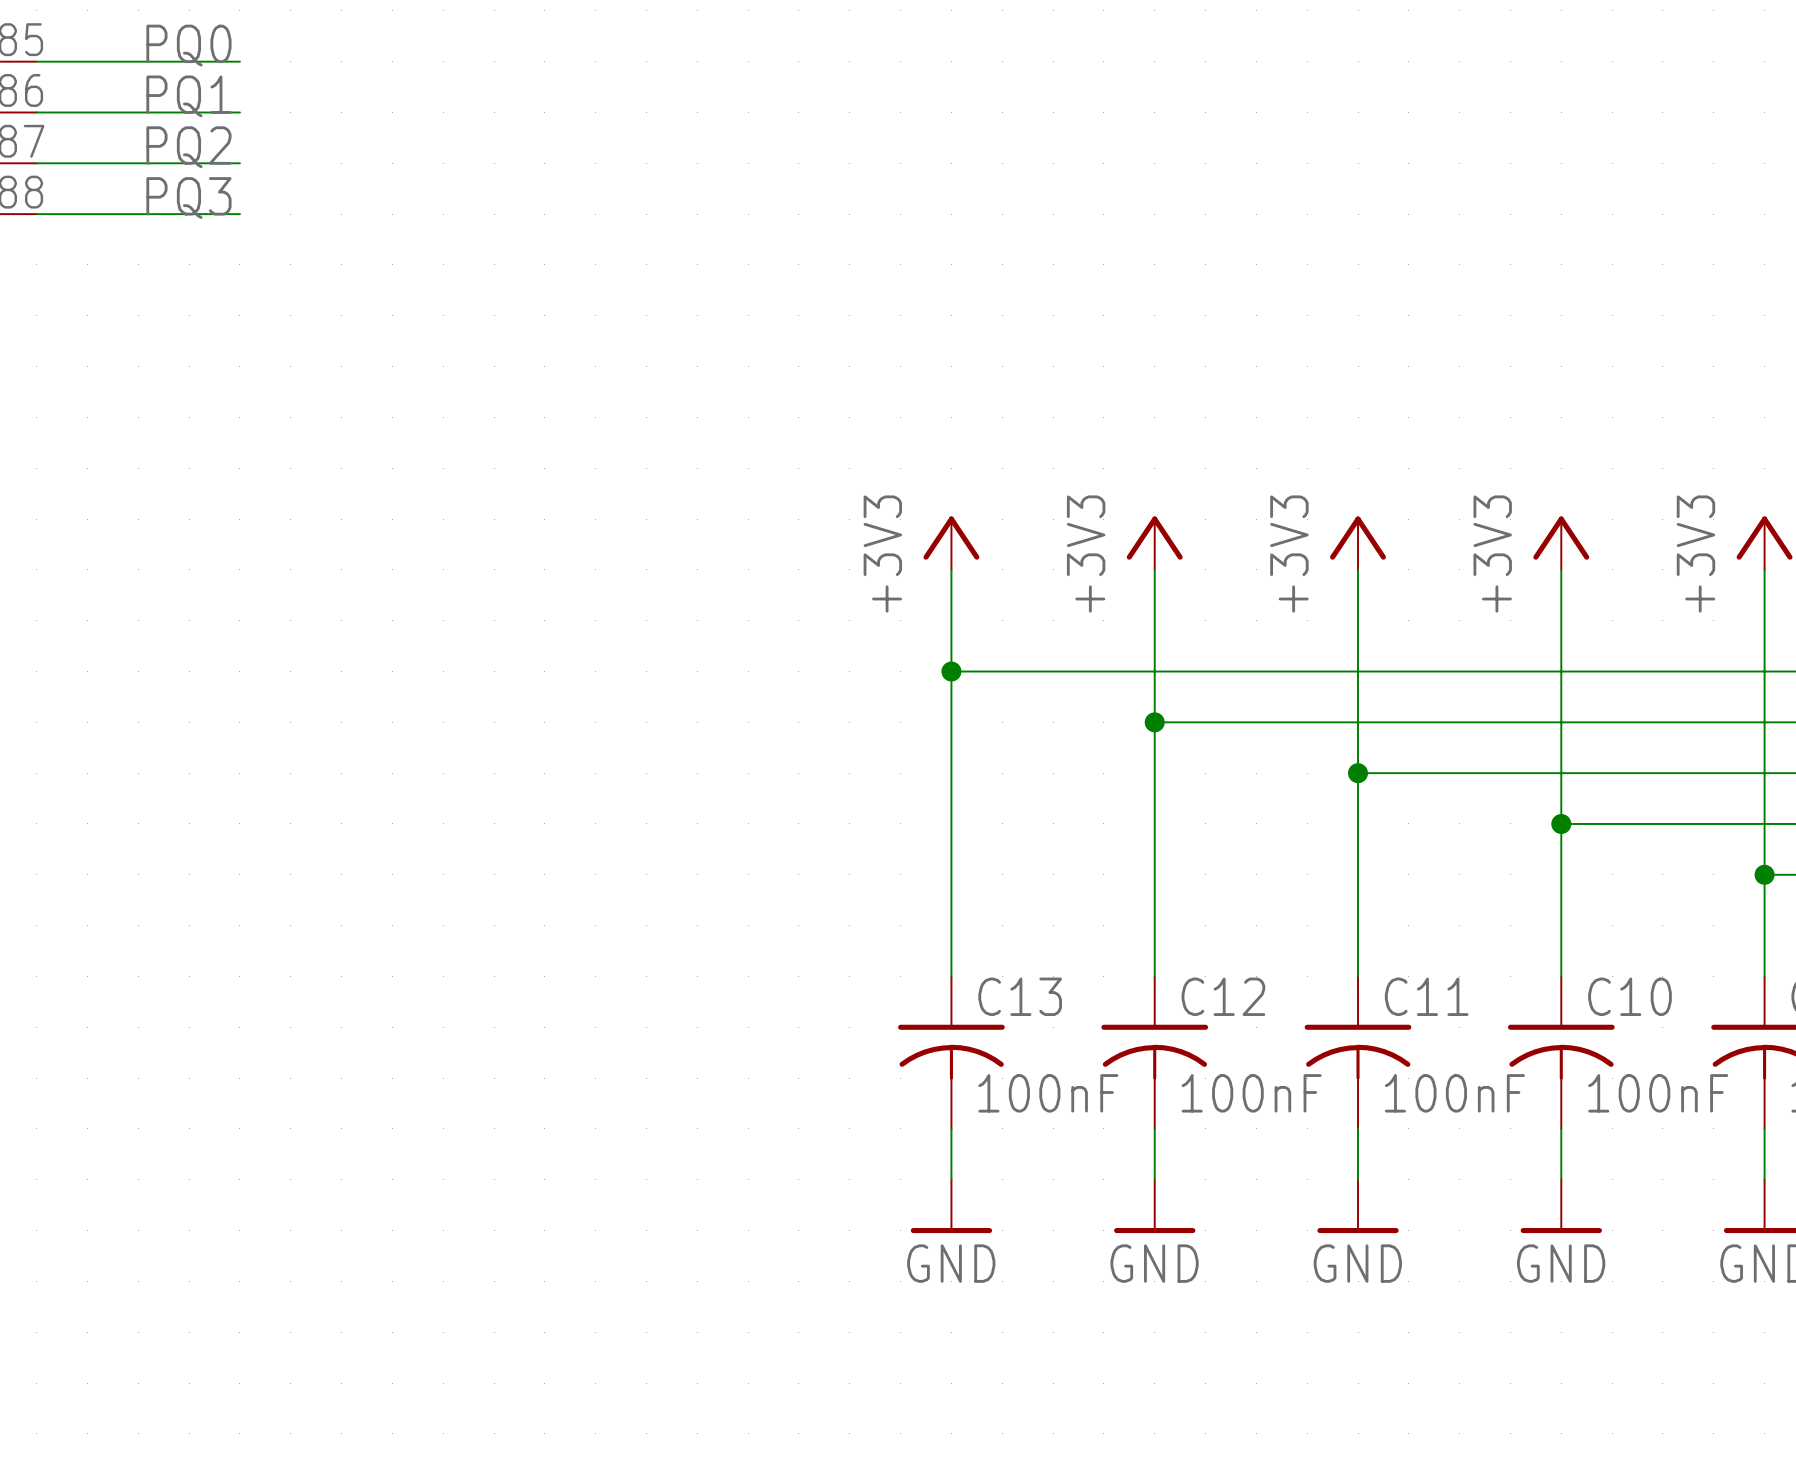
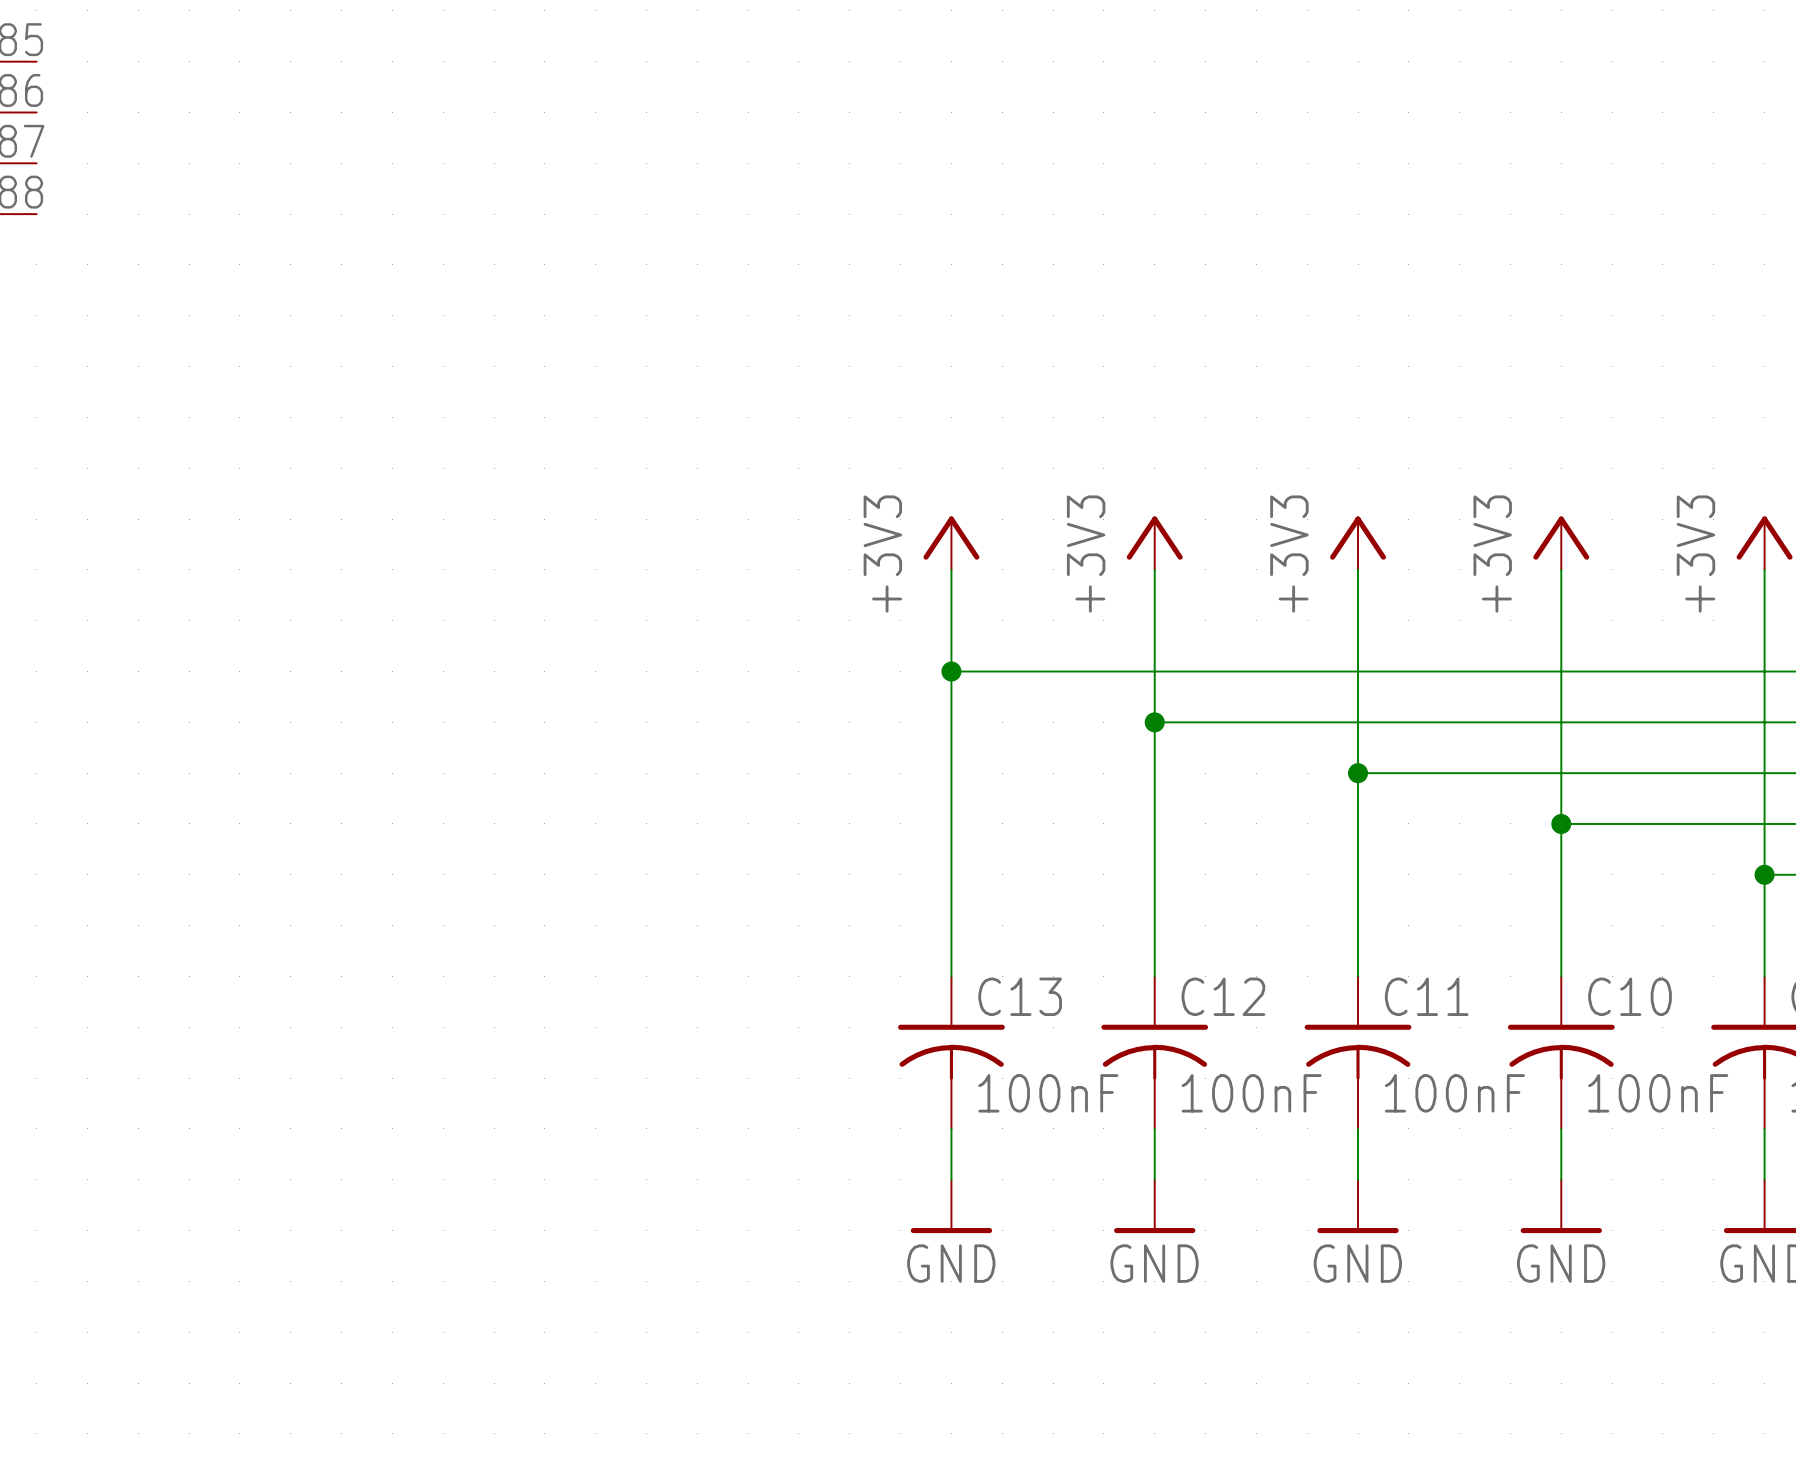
label: PQ0 (188, 45) -> none
wire: (36, 61) (239, 61) -> none
label: PQ1 (188, 96) -> none
wire: (36, 112) (239, 112) -> none
label: PQ2 (188, 147) -> none
wire: (36, 163) (239, 163) -> none
label: PQ3 (188, 198) -> none
wire: (36, 214) (239, 214) -> none

